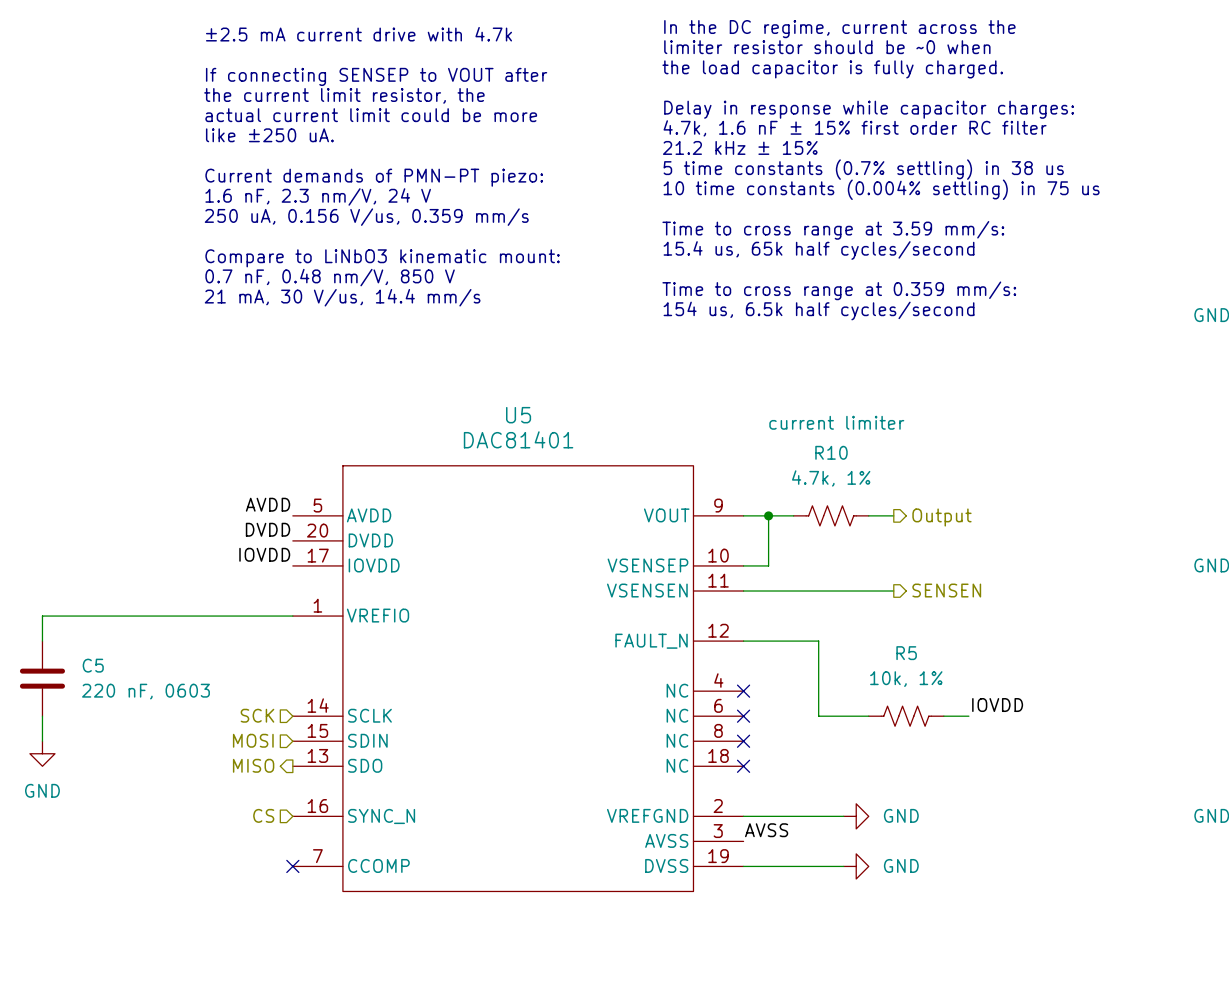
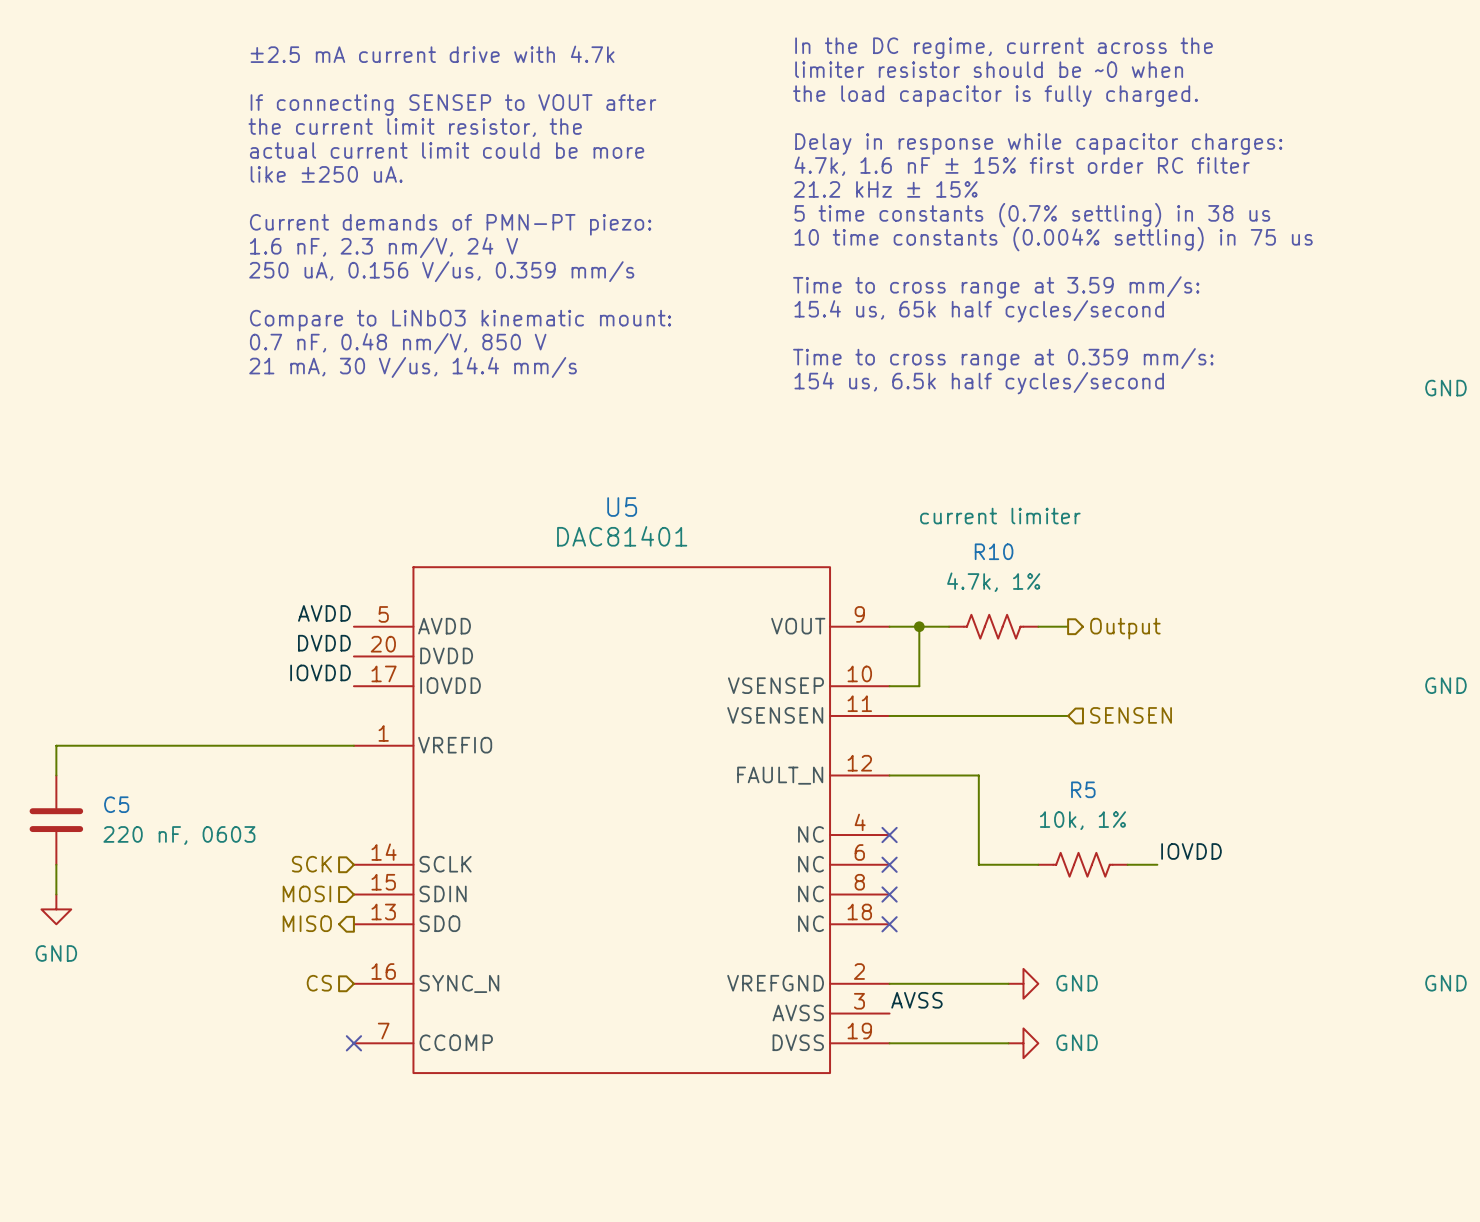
hierarchical label shape: output (946, 590) -> input (1131, 715)

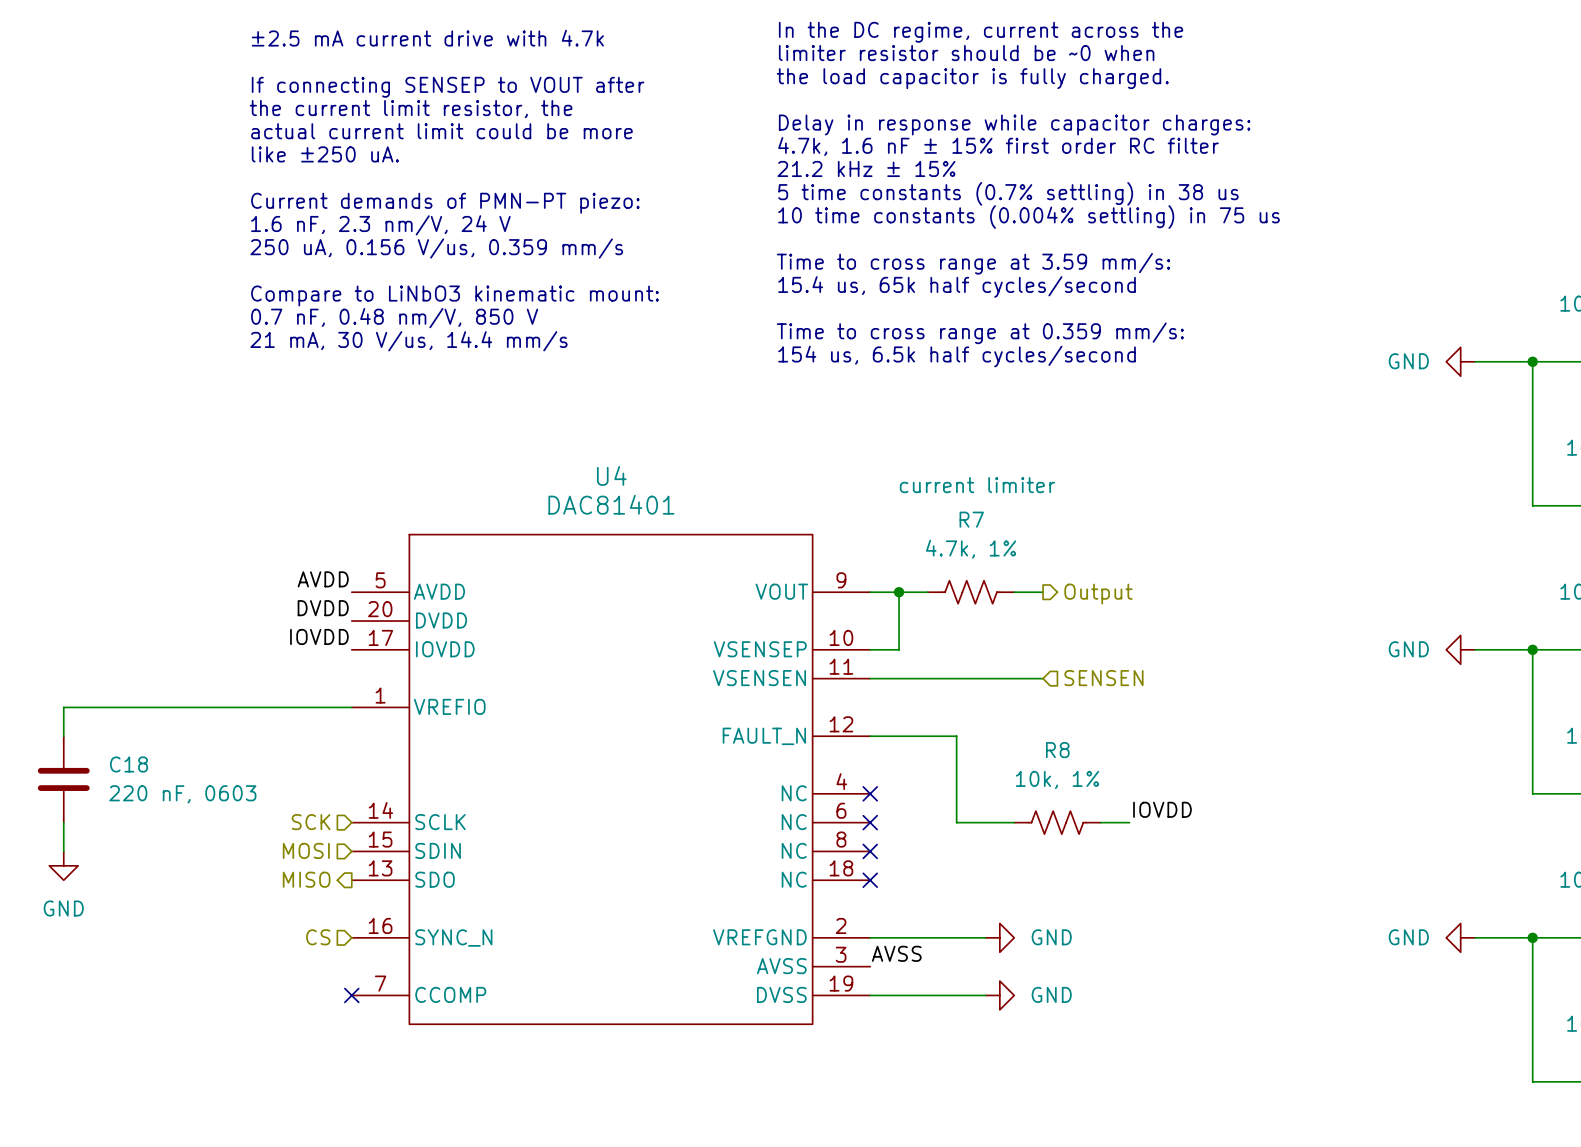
U5 name: U5 (622, 507) -> U4 (611, 475)
R10 name: R10 (994, 551) -> R7 (971, 519)
R5 name: R5 (1083, 789) -> R8 (1057, 750)
C5 name: C5 (116, 804) -> C18 (129, 764)

